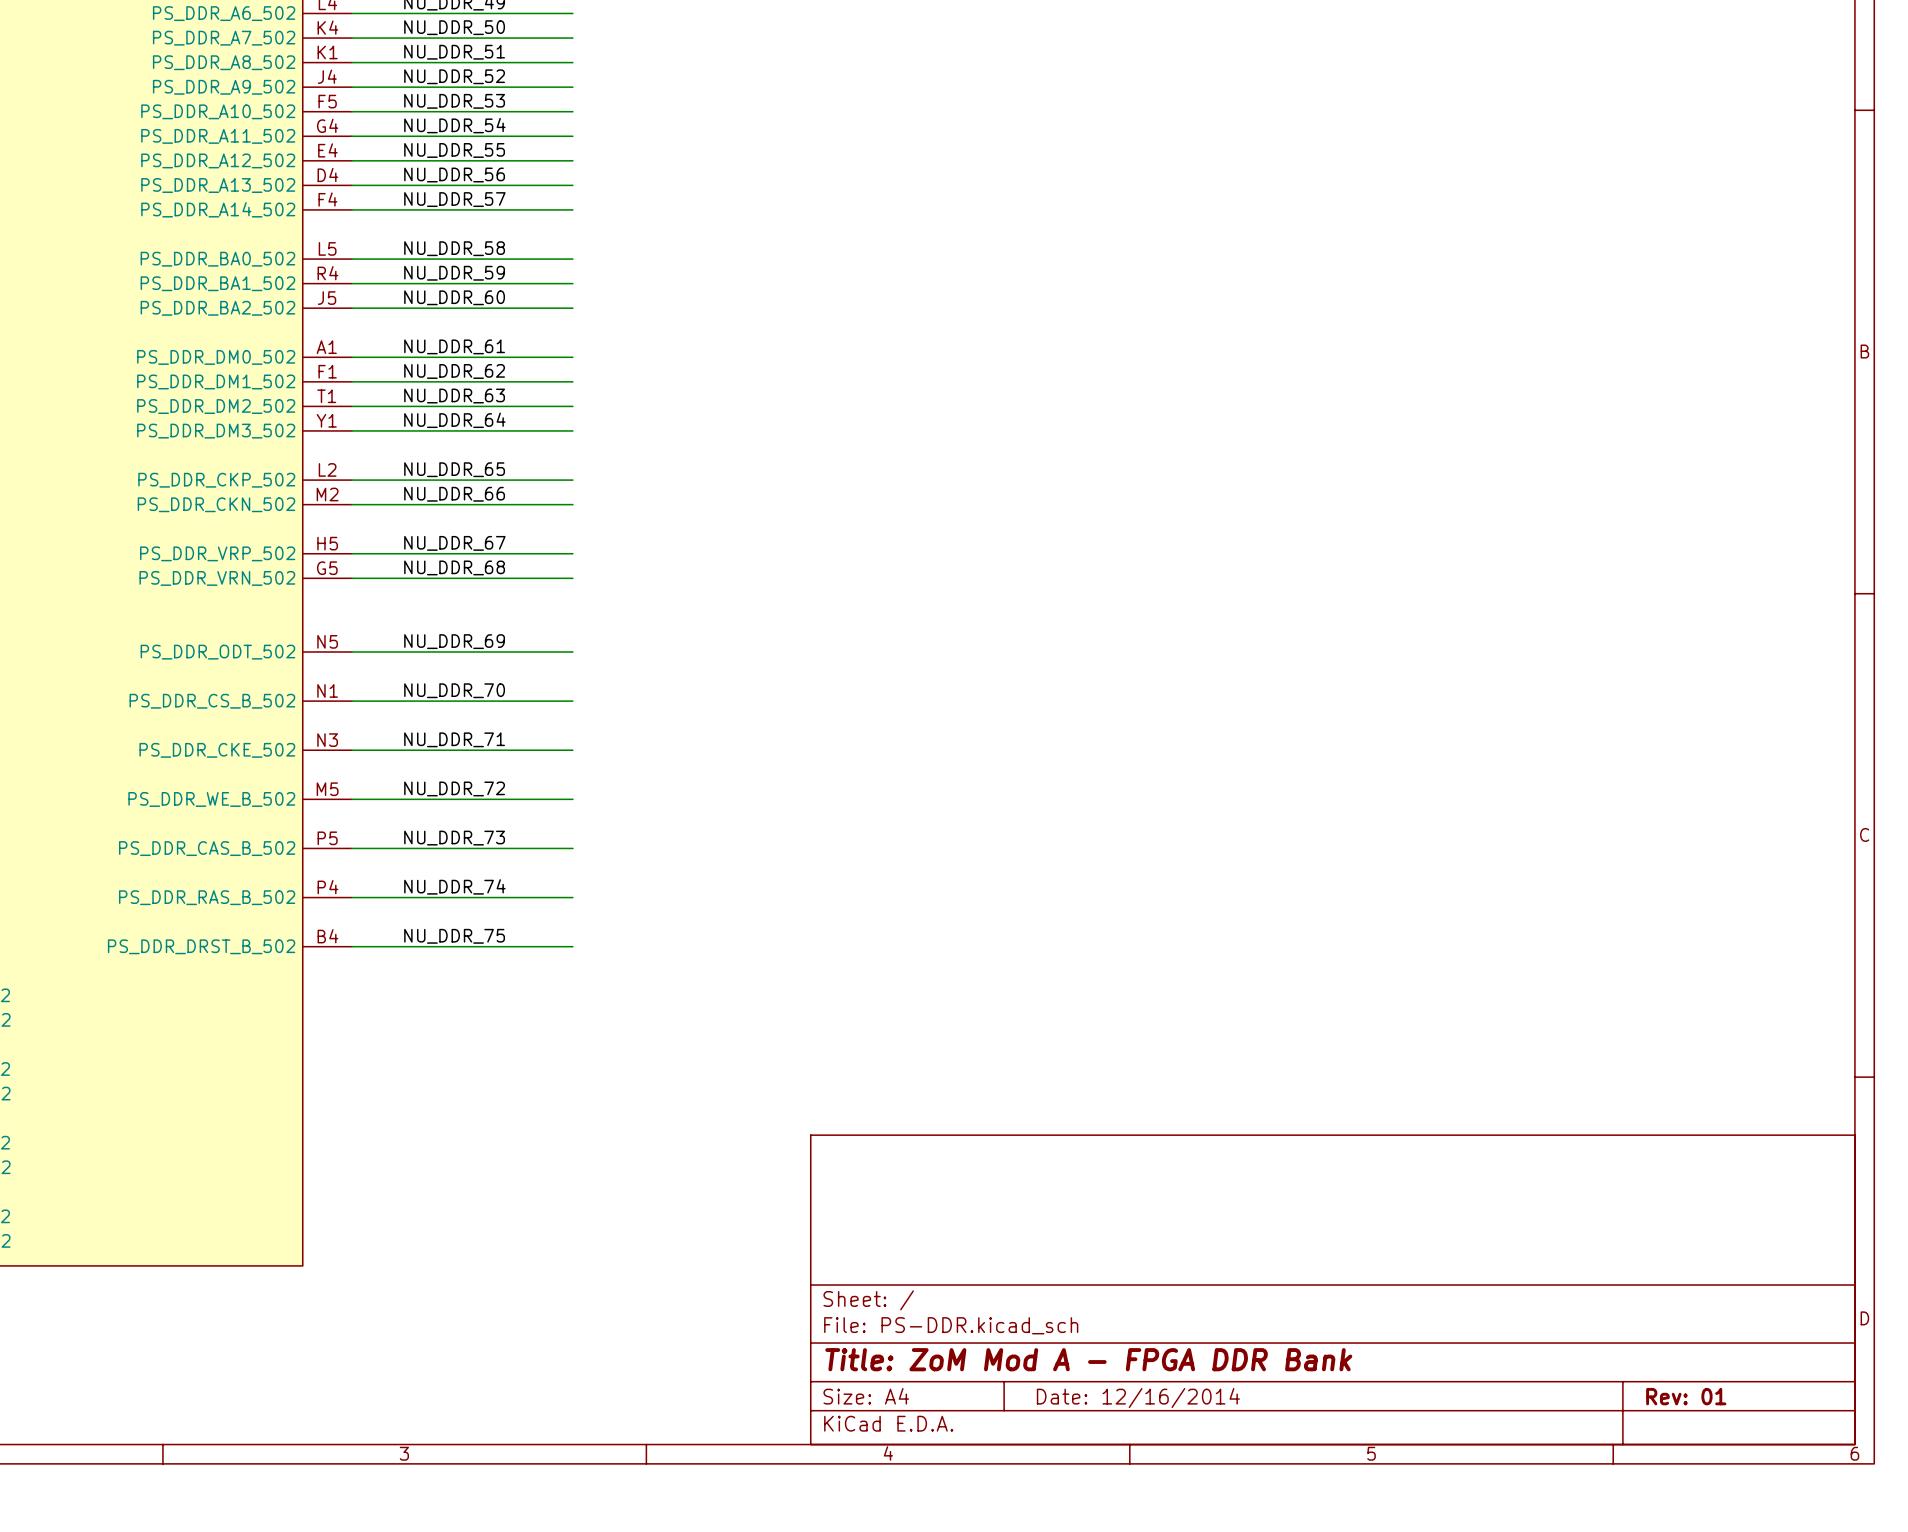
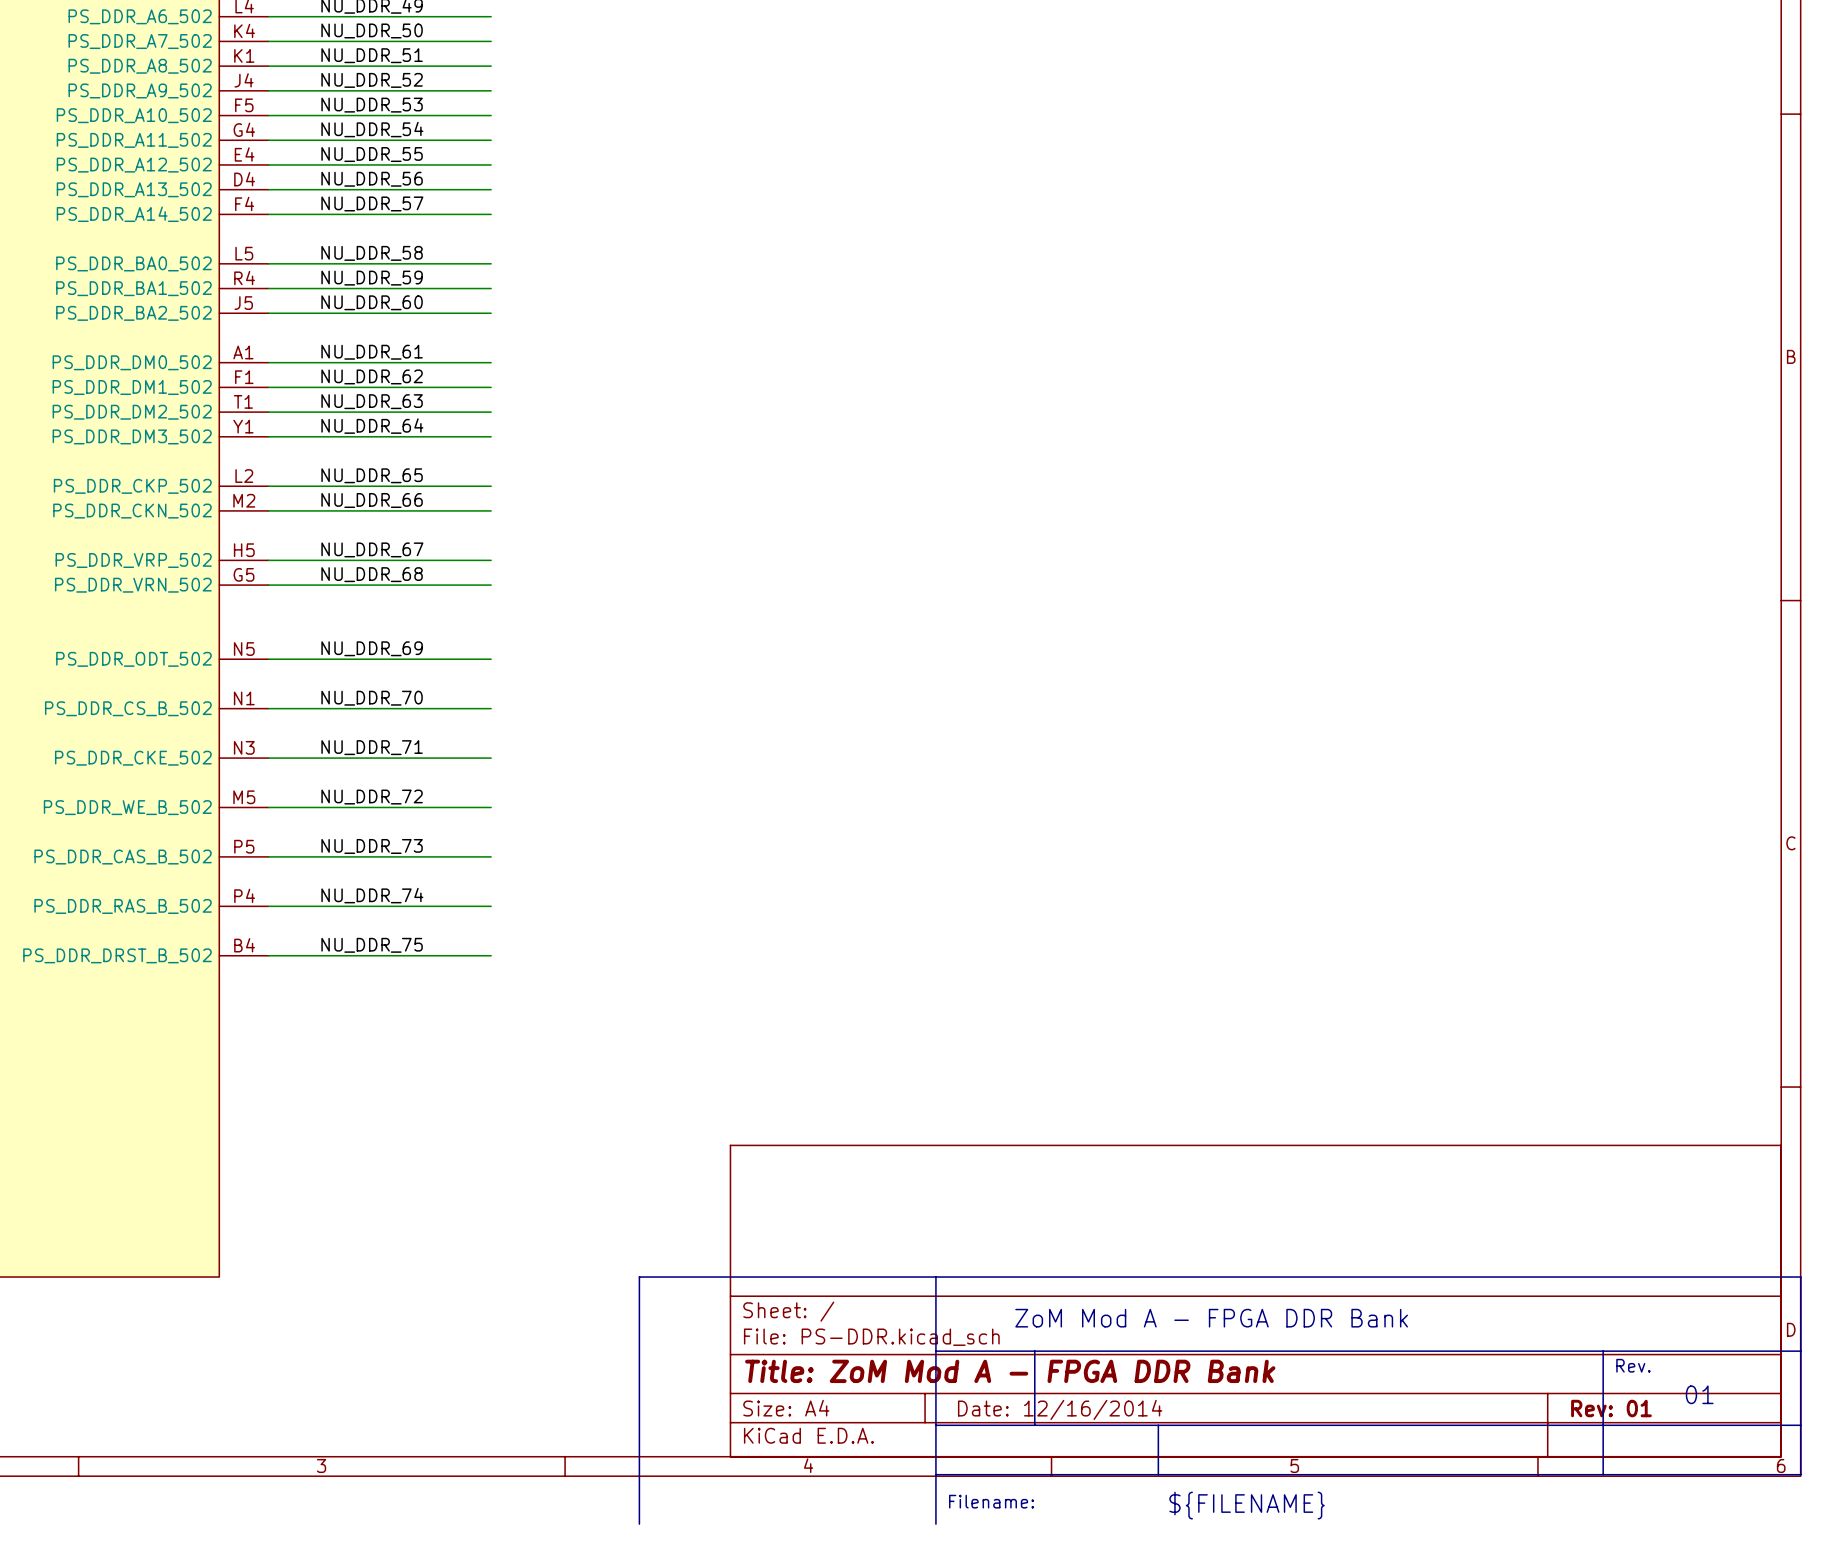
line: none -> (935, 1277) (935, 1524)
text: none -> ZoM Mod A - FPGA DDR Bank (1211, 1318)
line: none -> (935, 1351) (1800, 1351)
line: none -> (1034, 1351) (1034, 1425)
line: none -> (1603, 1351) (1603, 1474)
text: none -> Rev. (1633, 1365)
text: none -> 01 (1699, 1394)
line: none -> (935, 1425) (1800, 1425)
line: none -> (1158, 1425) (1158, 1474)
line: none -> (935, 1474) (1800, 1474) (1800, 1277) (639, 1277) (639, 1524)
text: none -> Filename: (991, 1501)
text: none -> ${FILENAME} (1247, 1505)

